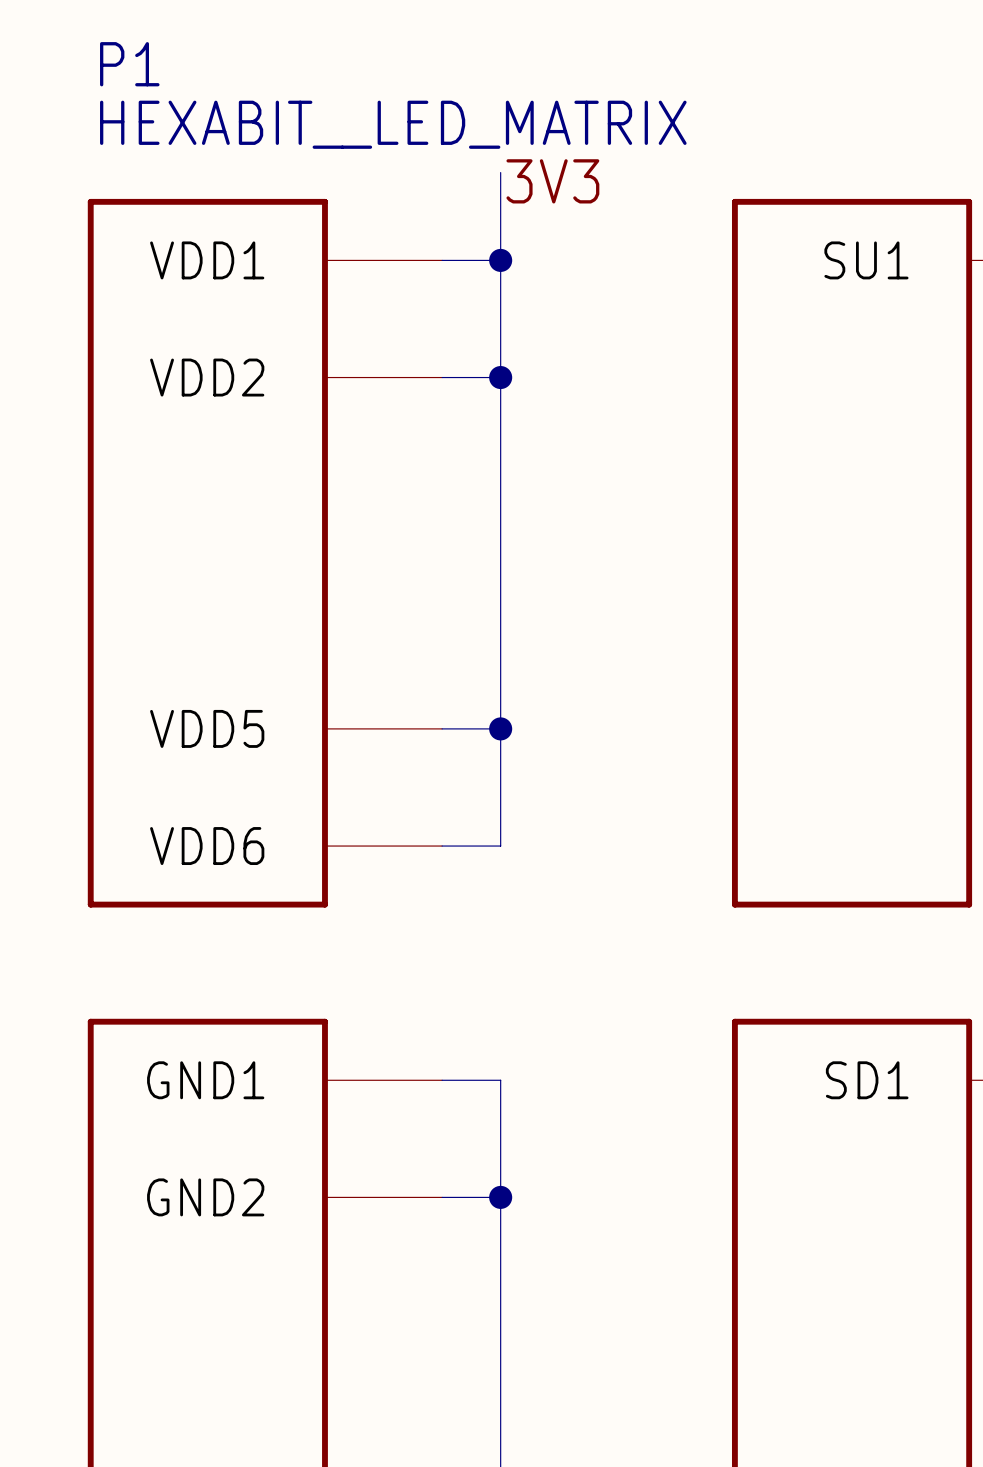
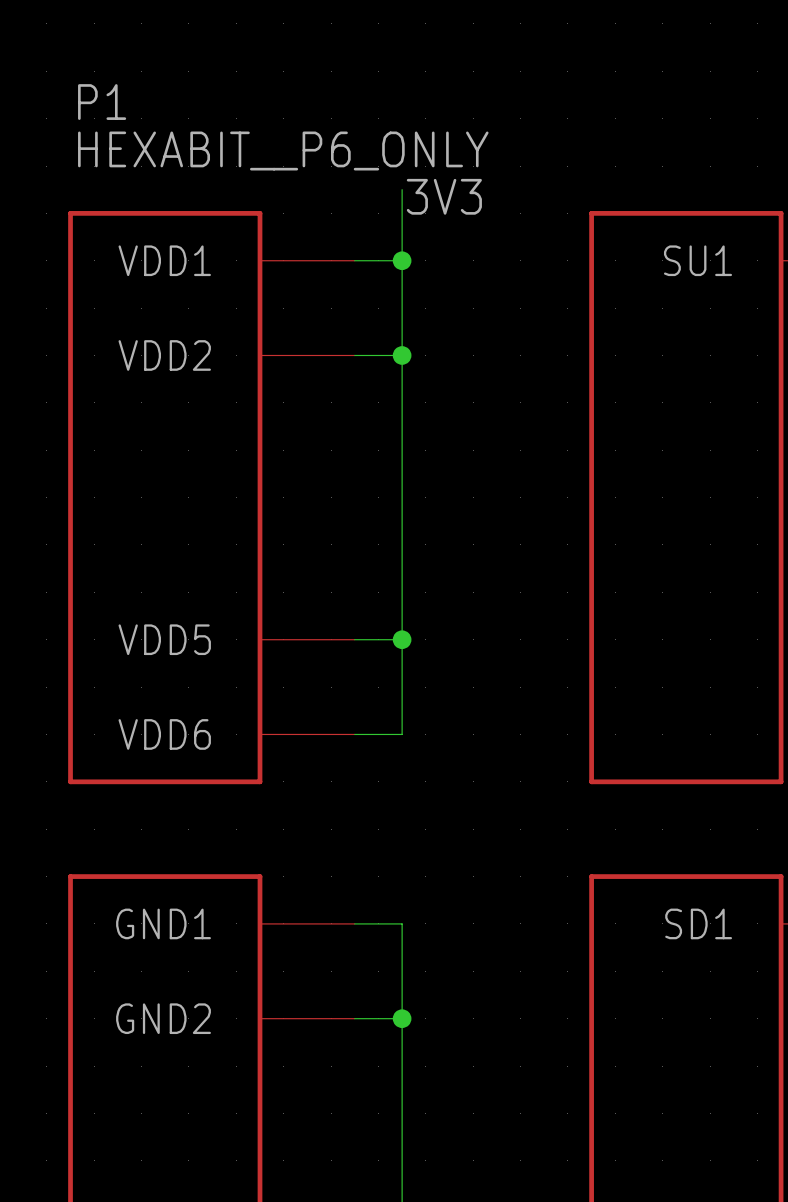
P1 value: HEXABIT__LED_MATRIX (393, 124) -> HEXABIT__P6_ONLY (283, 151)

